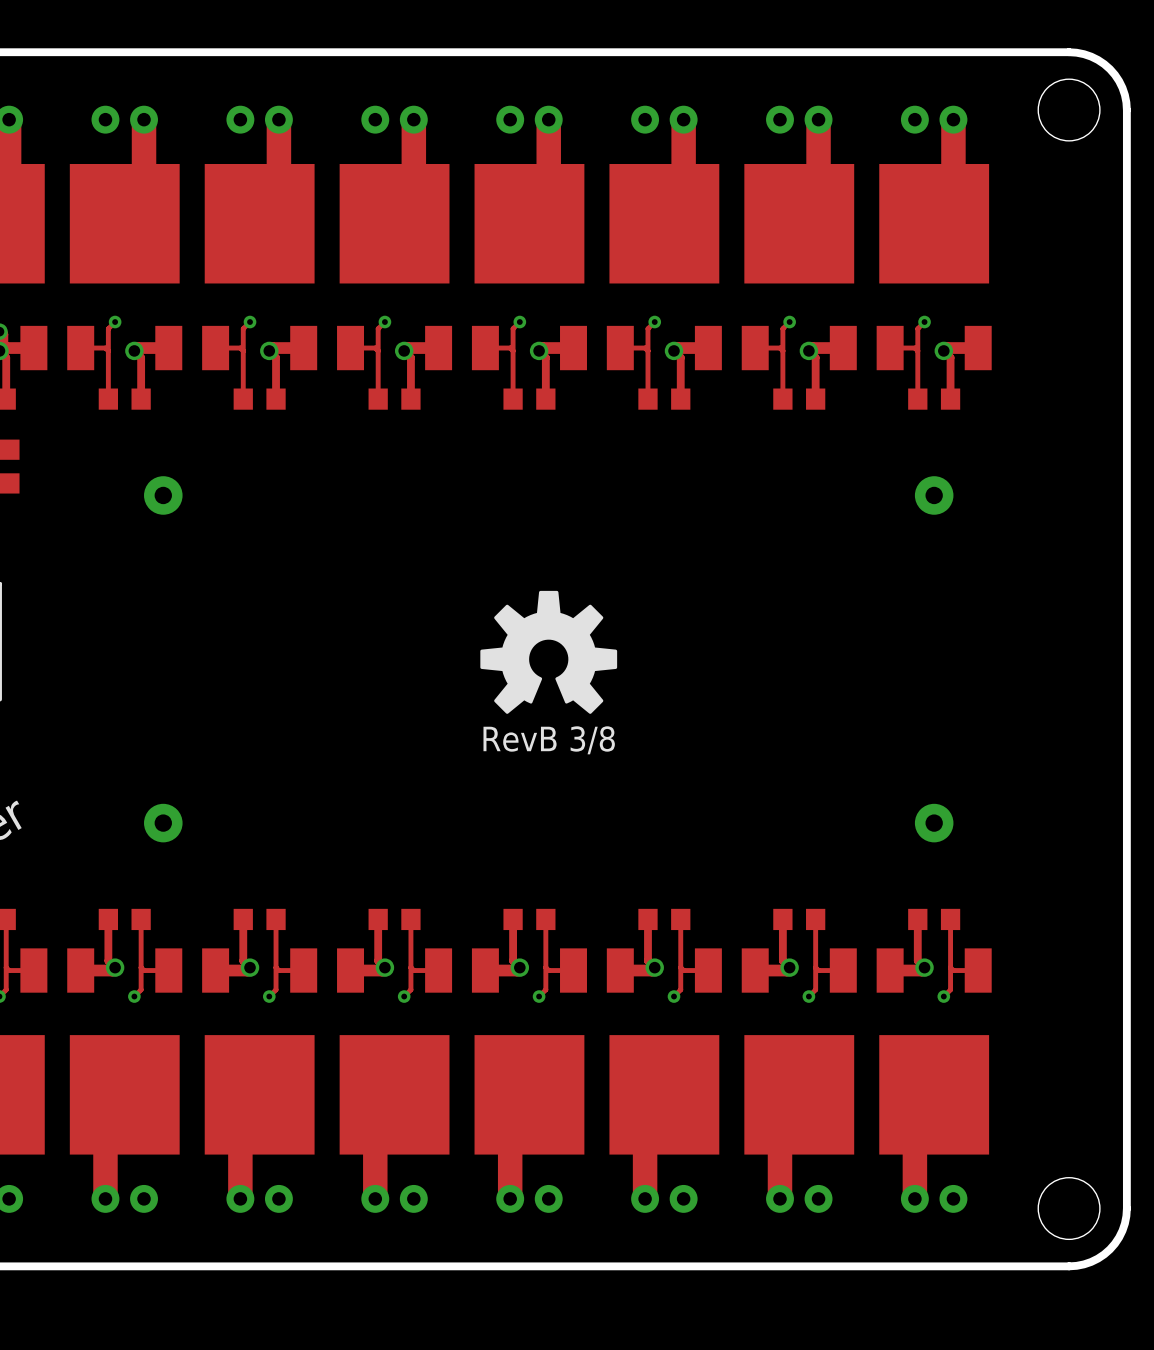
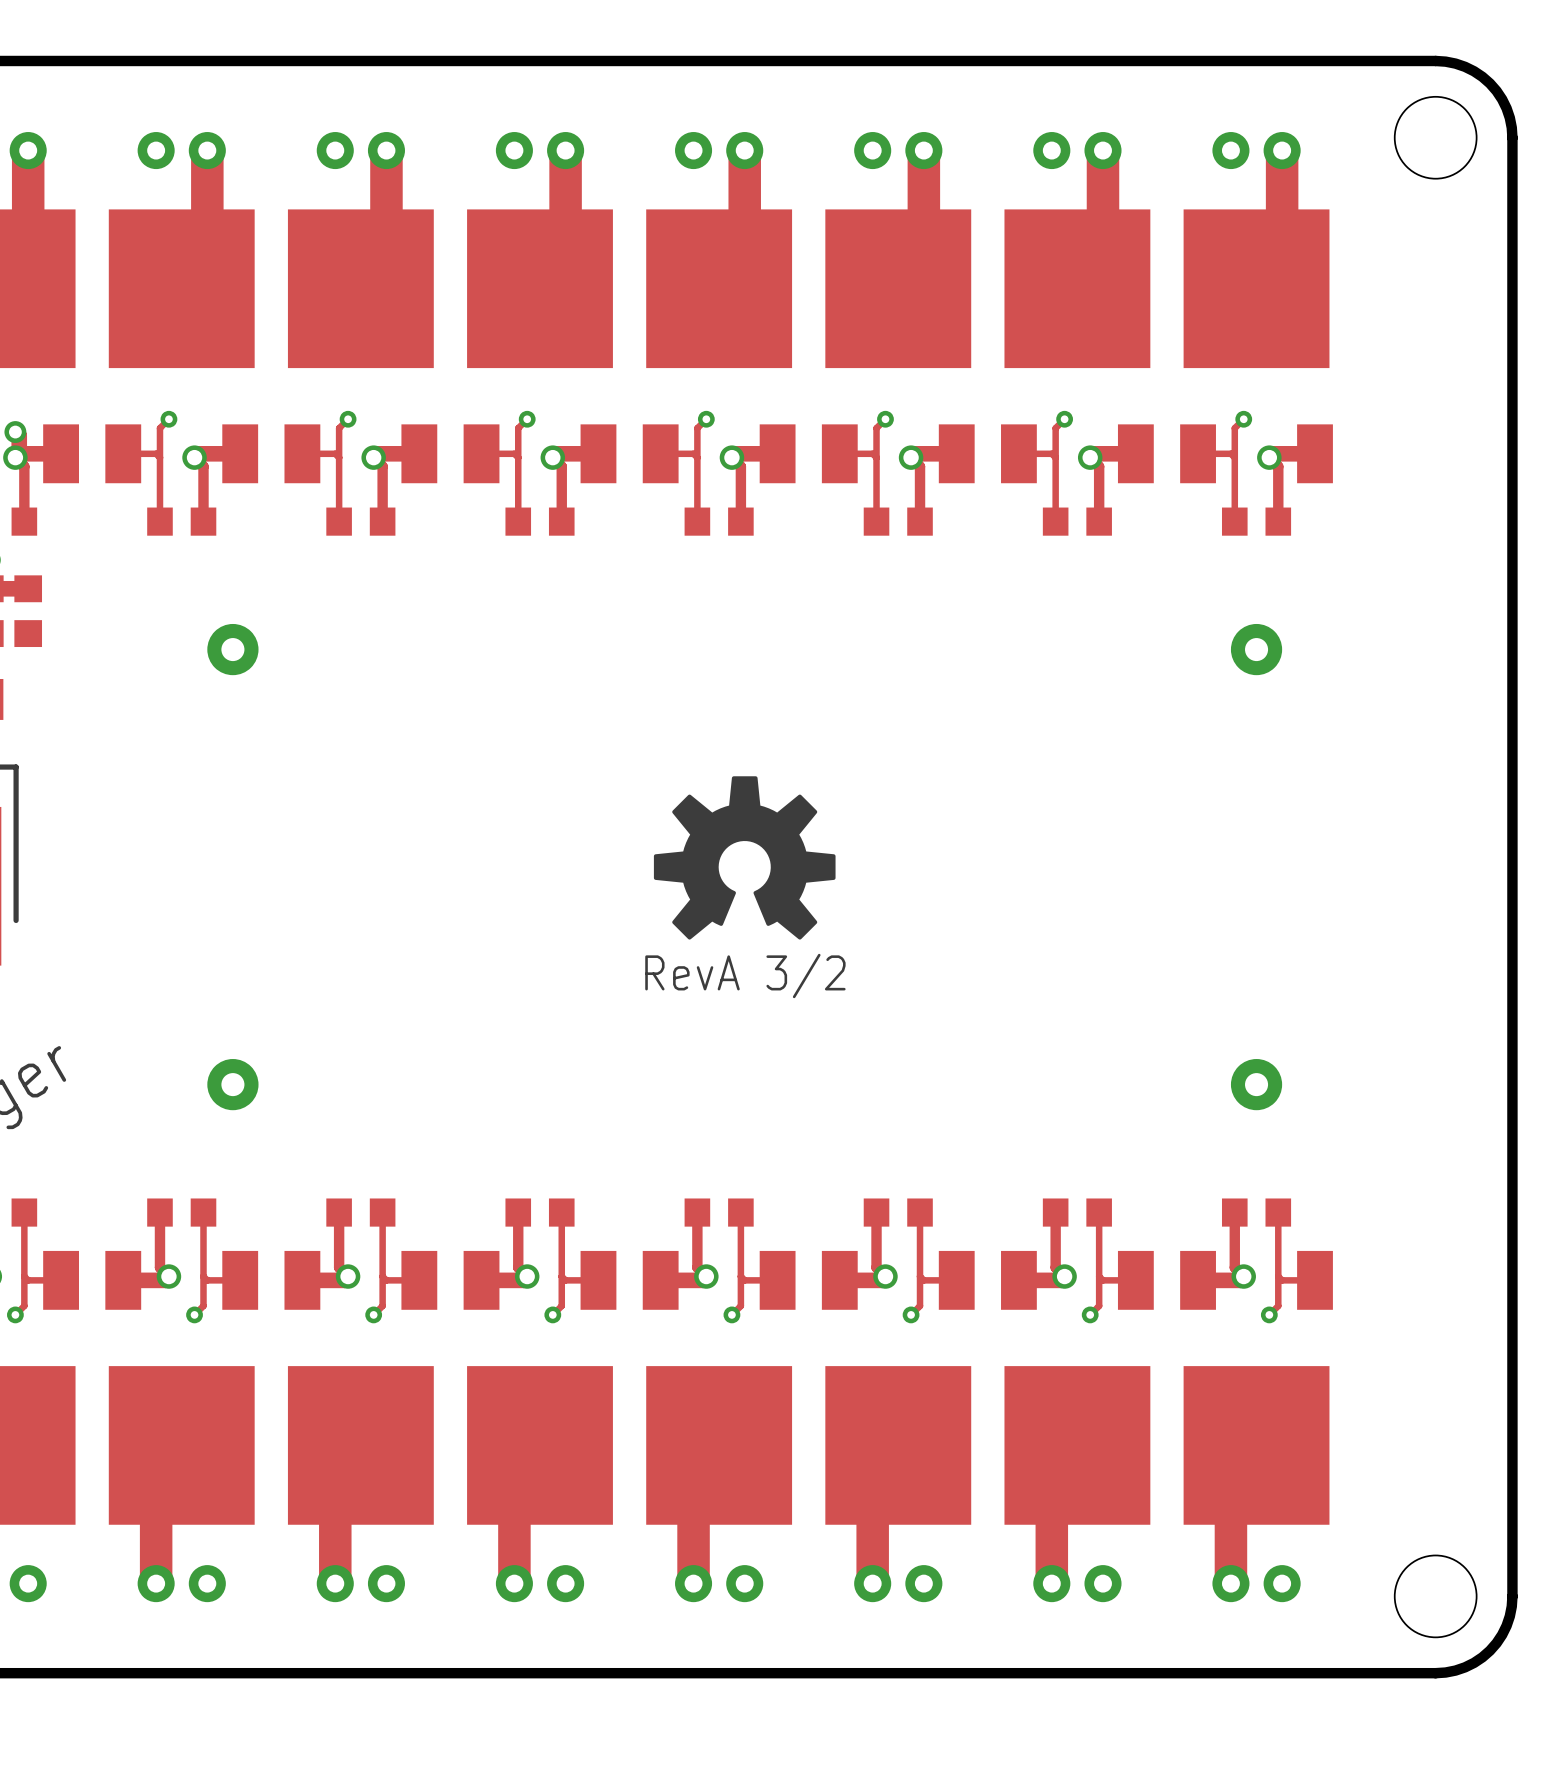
text: RevB 3/8 (549, 740) -> RevA 3/2 (745, 975)

